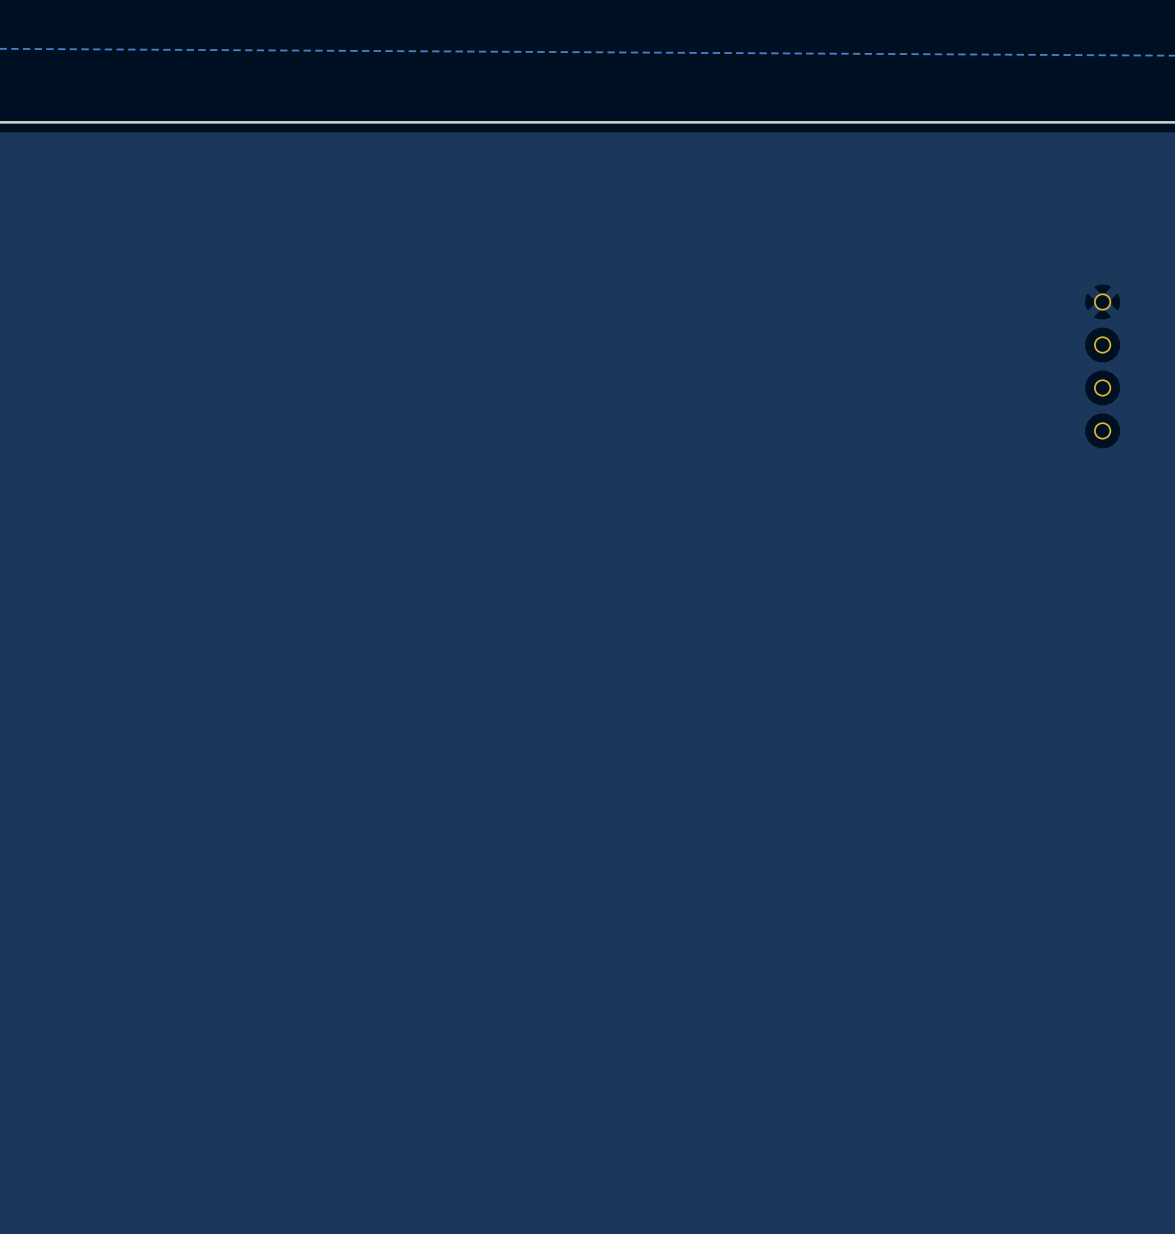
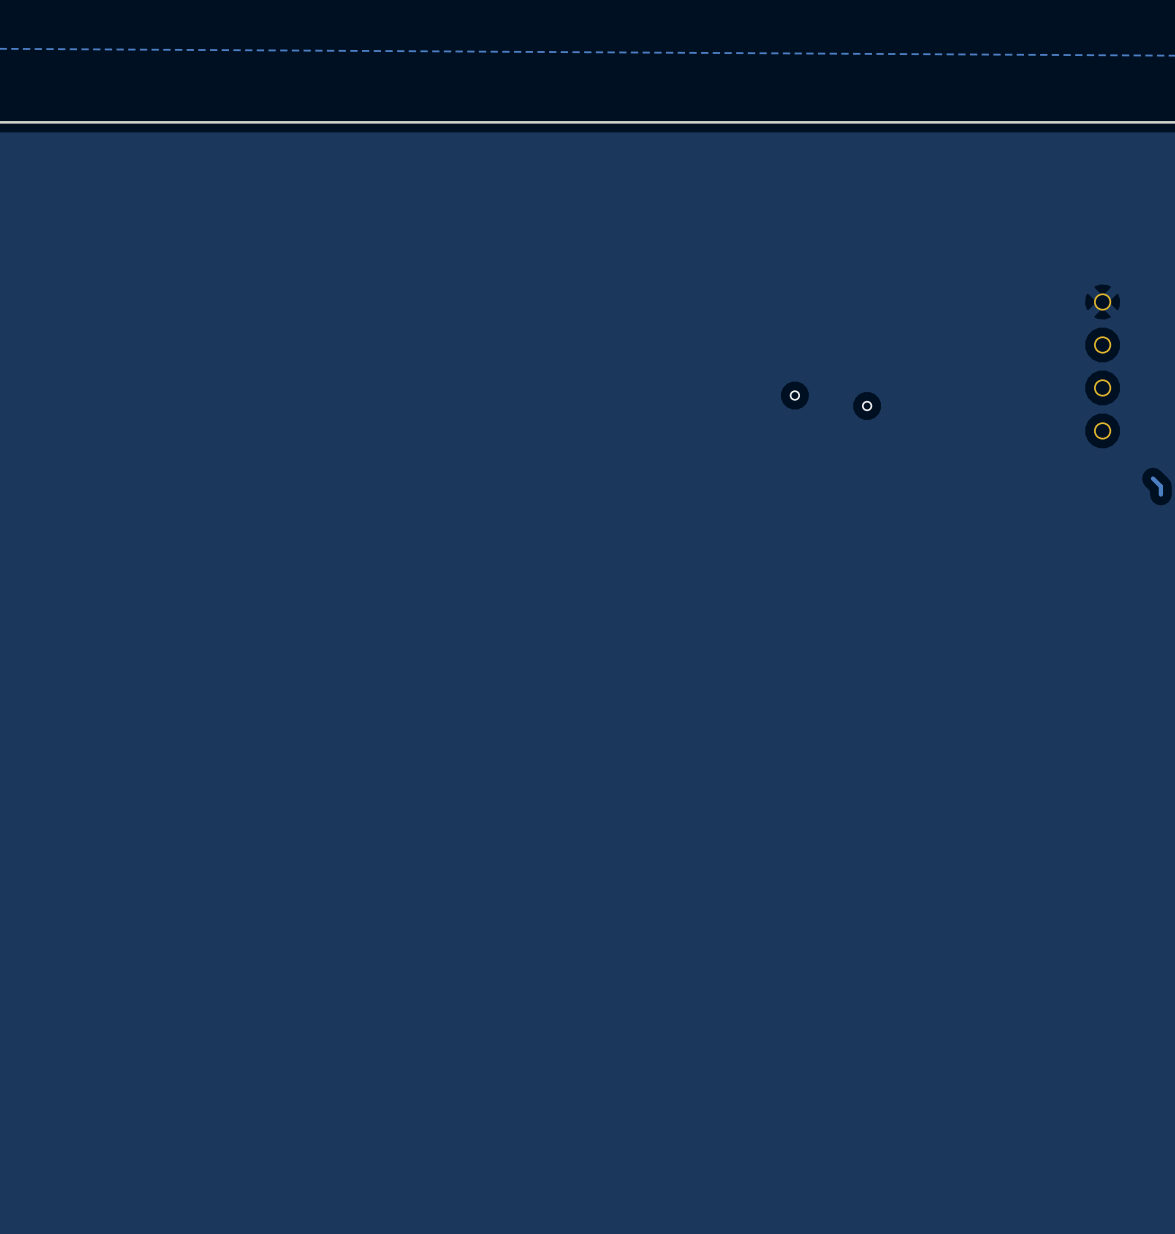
via: none -> (794, 395)
via: none -> (867, 406)
track: none -> (1152, 478) (1160, 486) (1160, 494)

